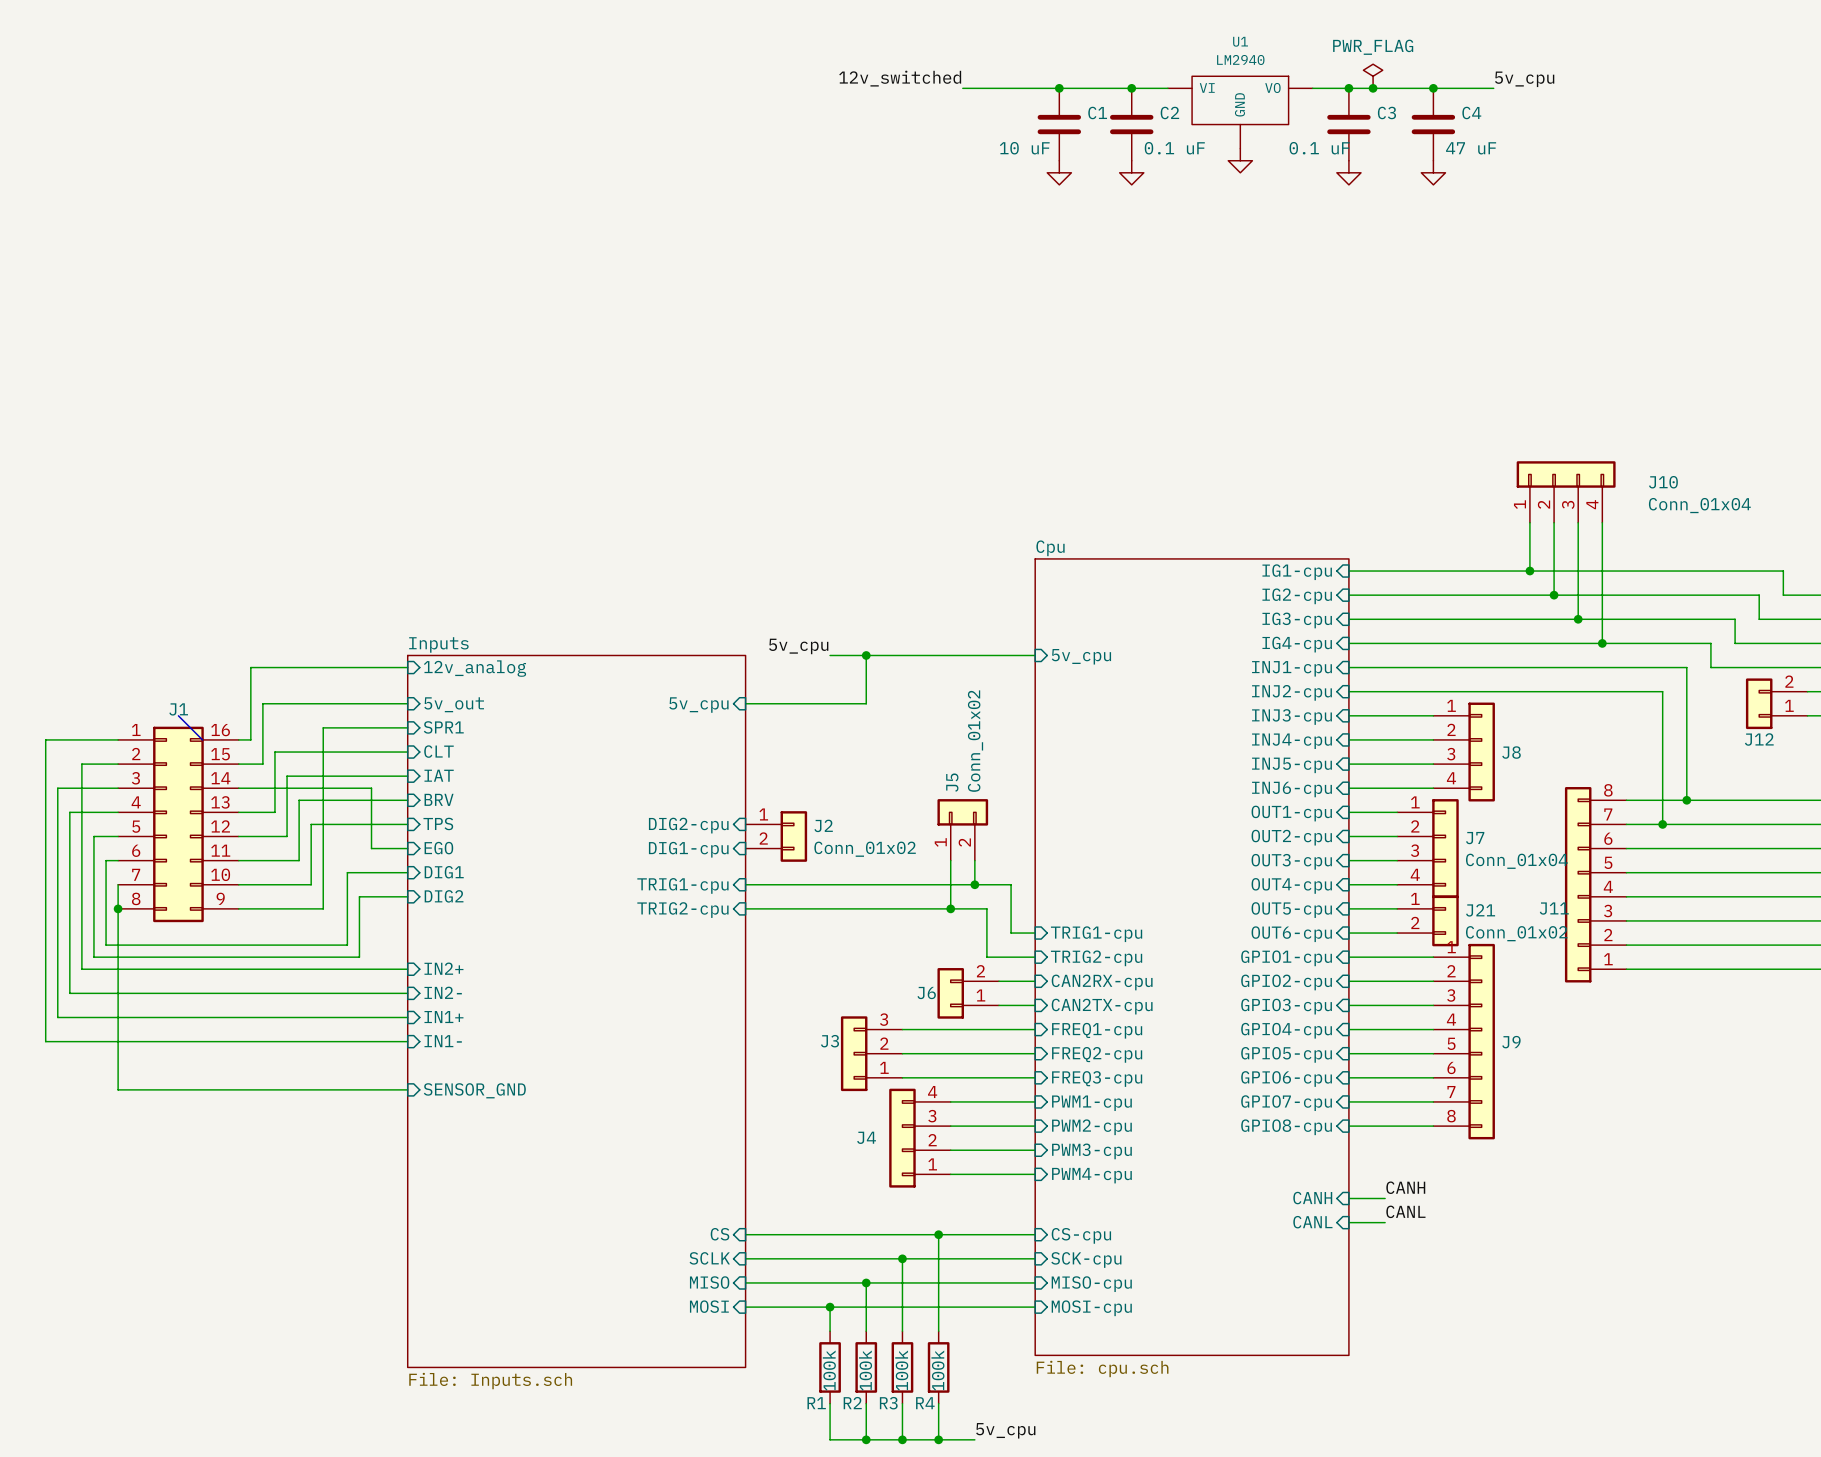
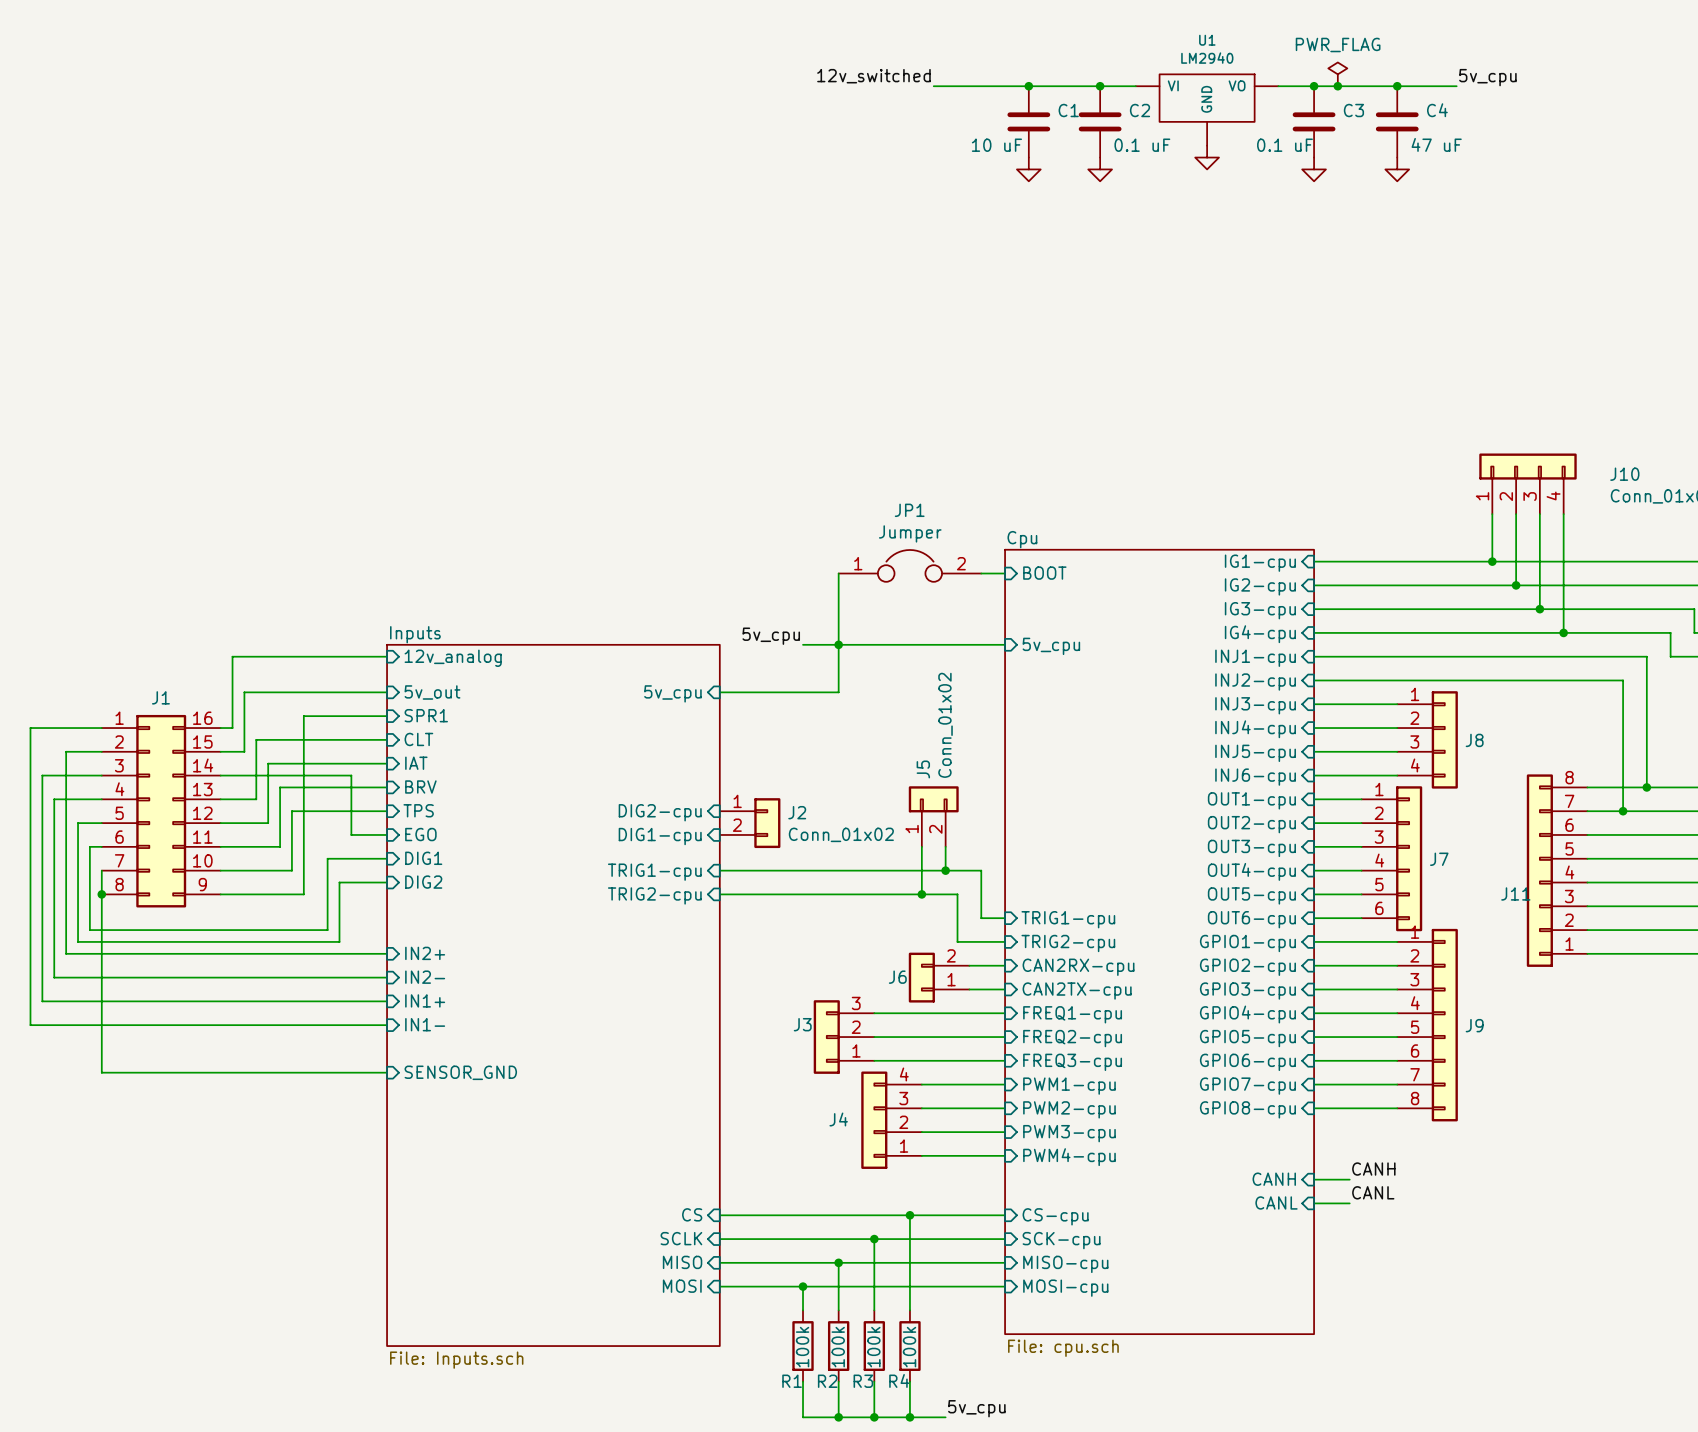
JP1: none -> Jumper (909, 565)
sheet pin: none -> BOOT (1044, 573)
wire: none -> (838, 573) (838, 644)
wire: none -> (981, 573) (1005, 573)
bus: (178, 715) (202, 739) -> none
J7 symbol: [1397, 799, 1459, 899] -> [1361, 786, 1423, 932]
J7 value: Conn_01x04 (1516, 861) -> none
J21: Conn_01x02 (1427, 920) -> none

